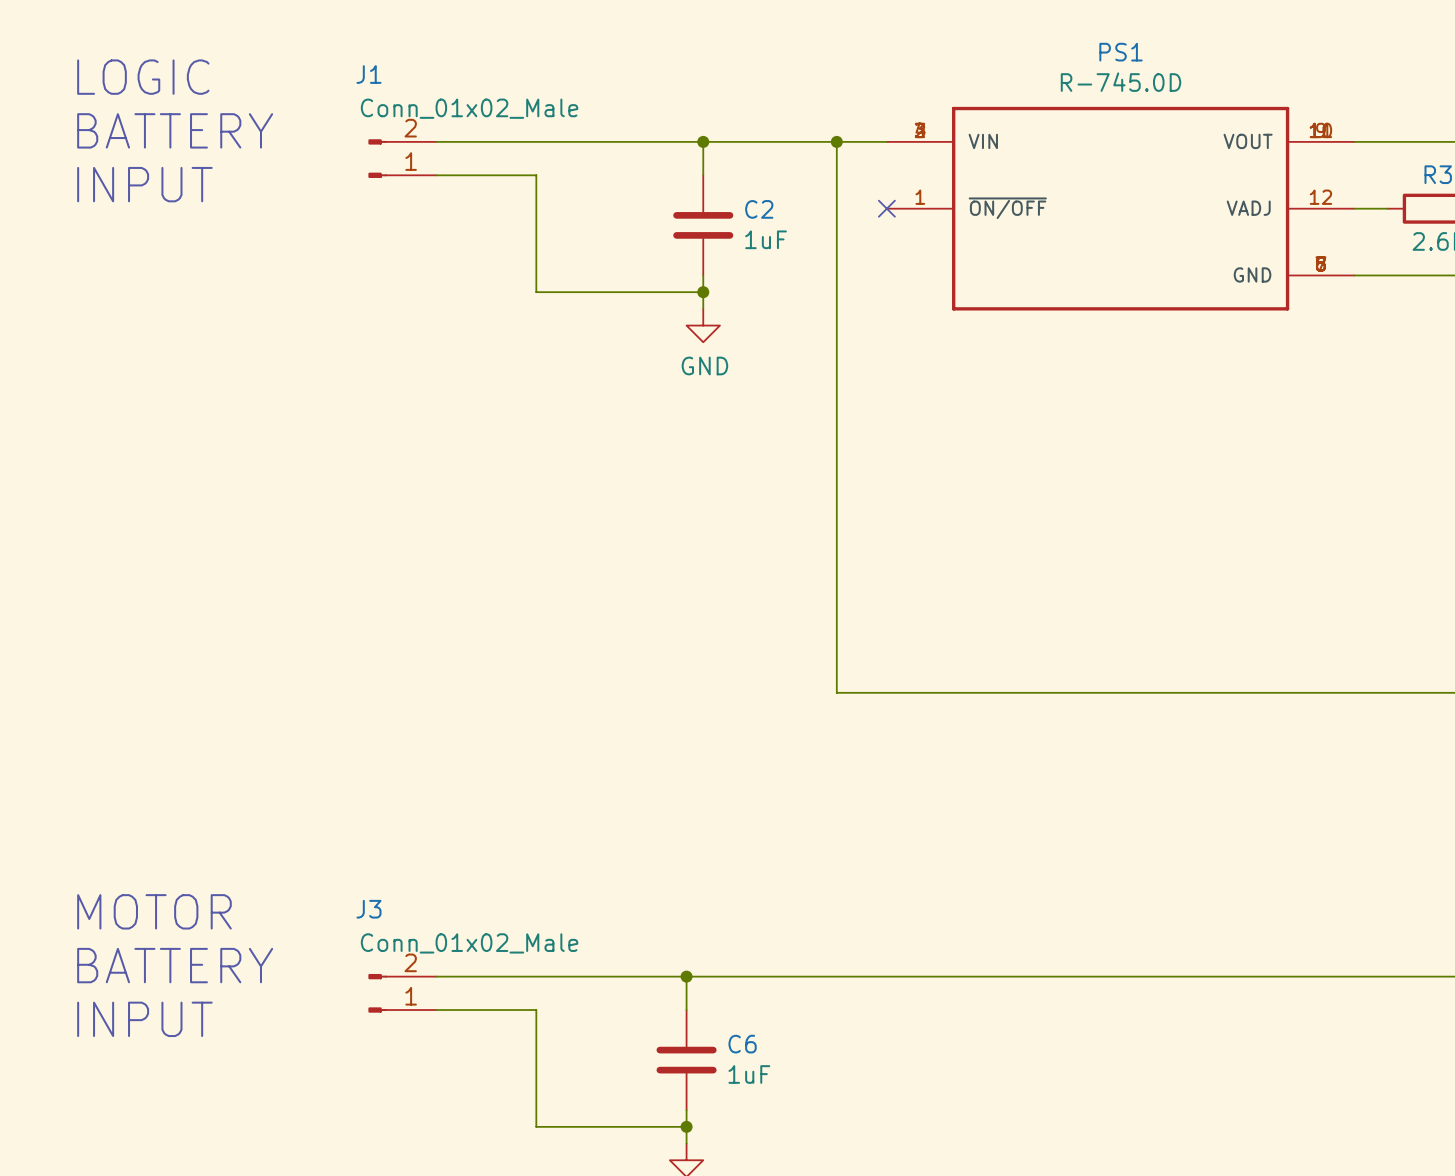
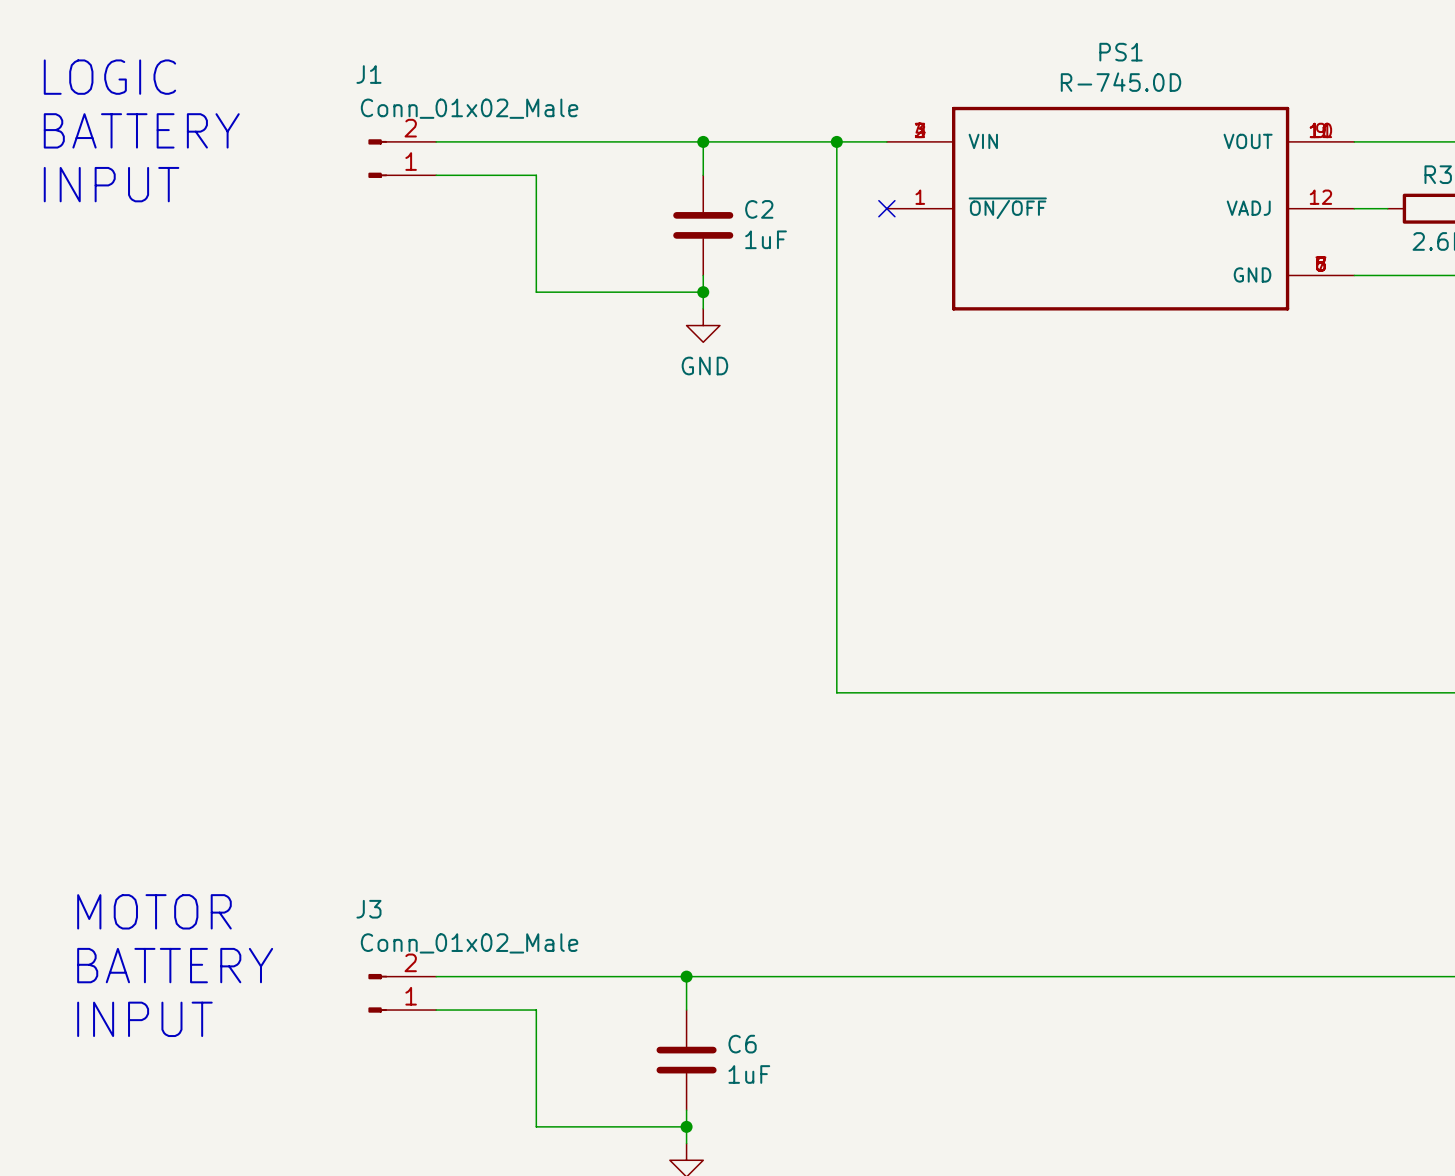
text position: LOGIC (143, 77) -> LOGIC (109, 77)
text position: BATTERY (175, 130) -> BATTERY (141, 130)
text position: INPUT (144, 184) -> INPUT (111, 184)

